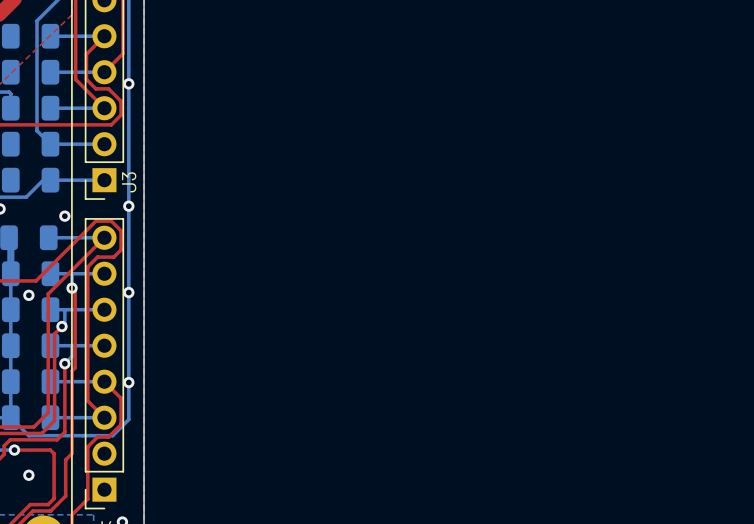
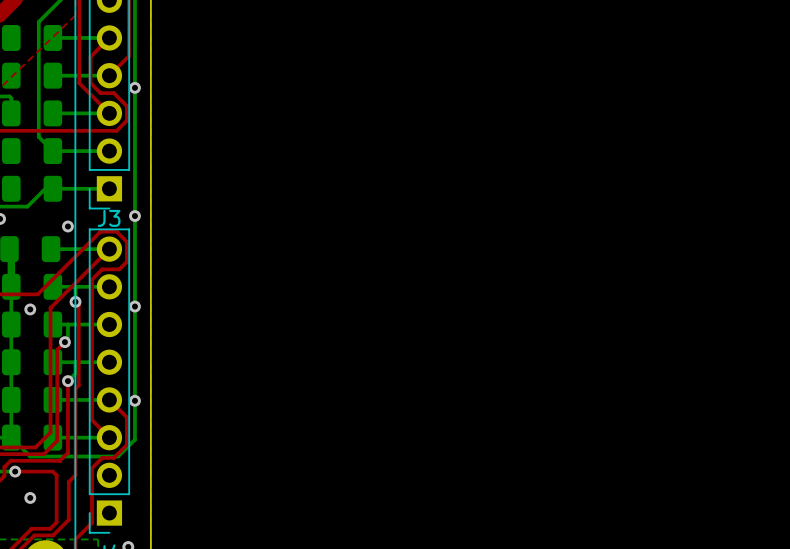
J3 name rotation: 0° (129, 182) -> 90° clockwise (109, 218)
J3 name position: J3 (129, 182) -> J3 (109, 218)

